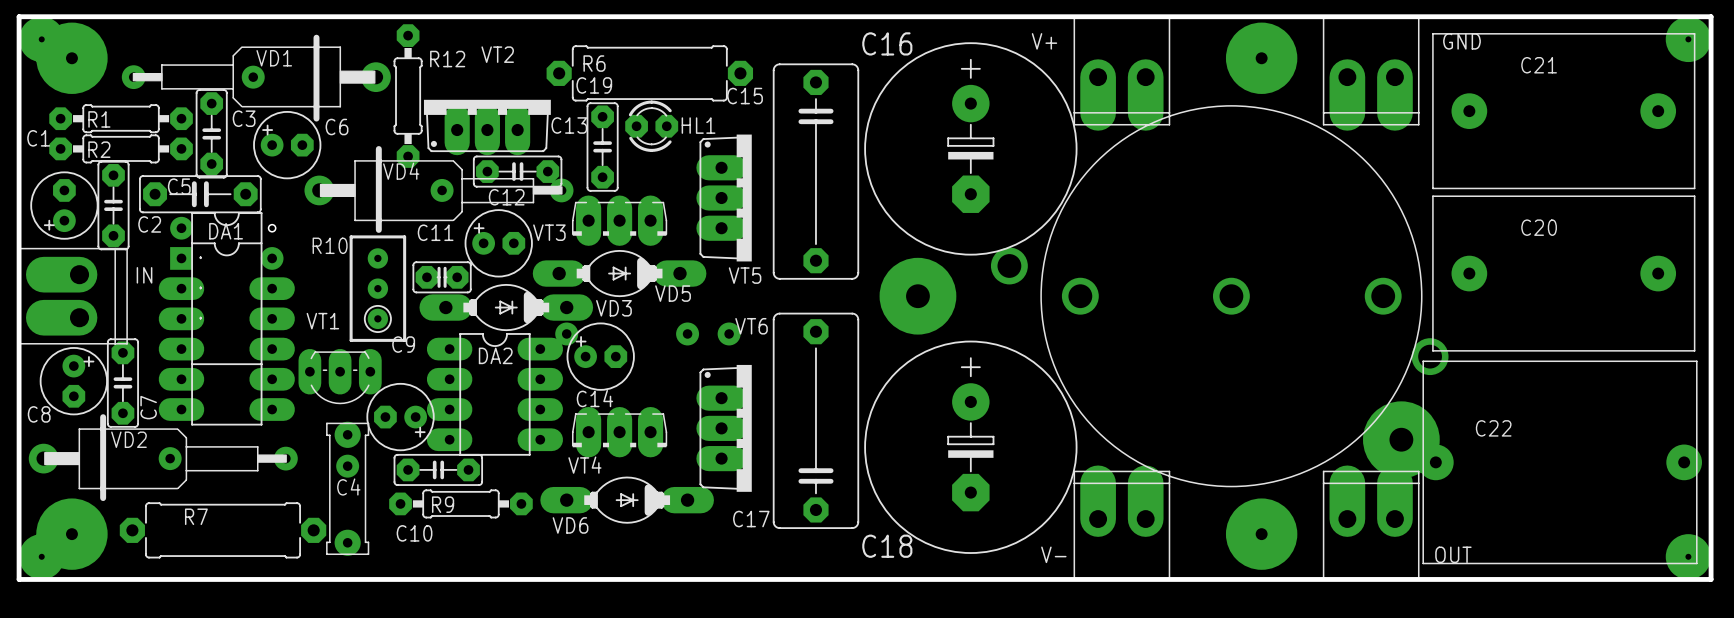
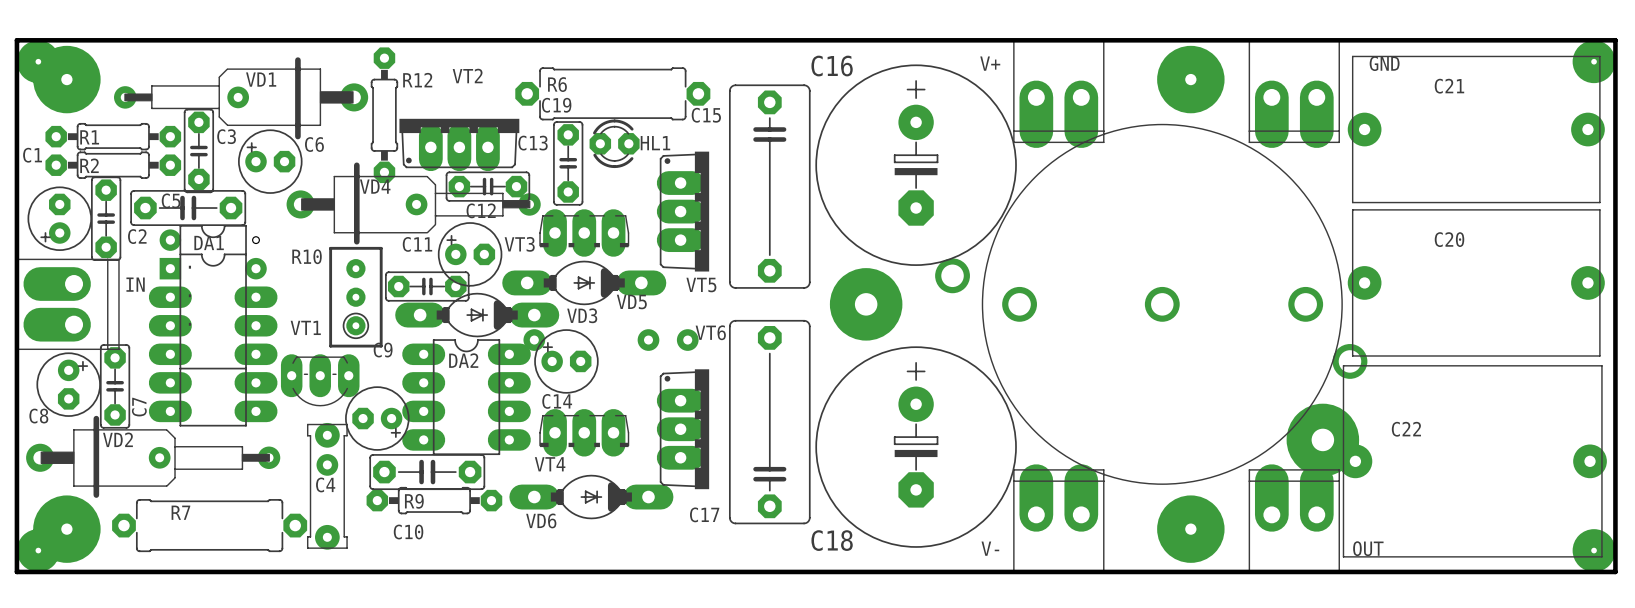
C21 footprint: [1432, 33, 1696, 190] -> [1347, 55, 1605, 204]
C20 footprint: [1432, 195, 1696, 352] -> [1347, 209, 1605, 357]
C11 footprint: [412, 261, 472, 294] -> [385, 271, 470, 302]
C10 footprint: [393, 453, 484, 486] -> [369, 454, 486, 491]

